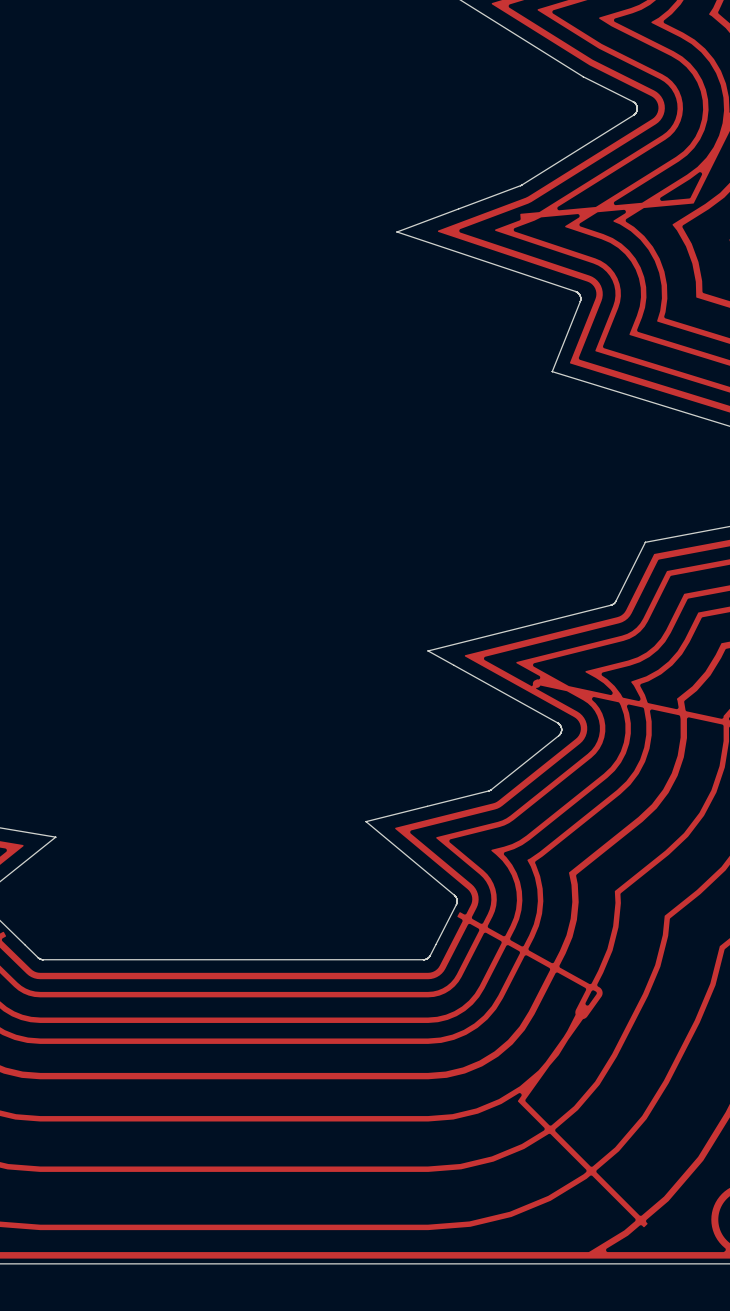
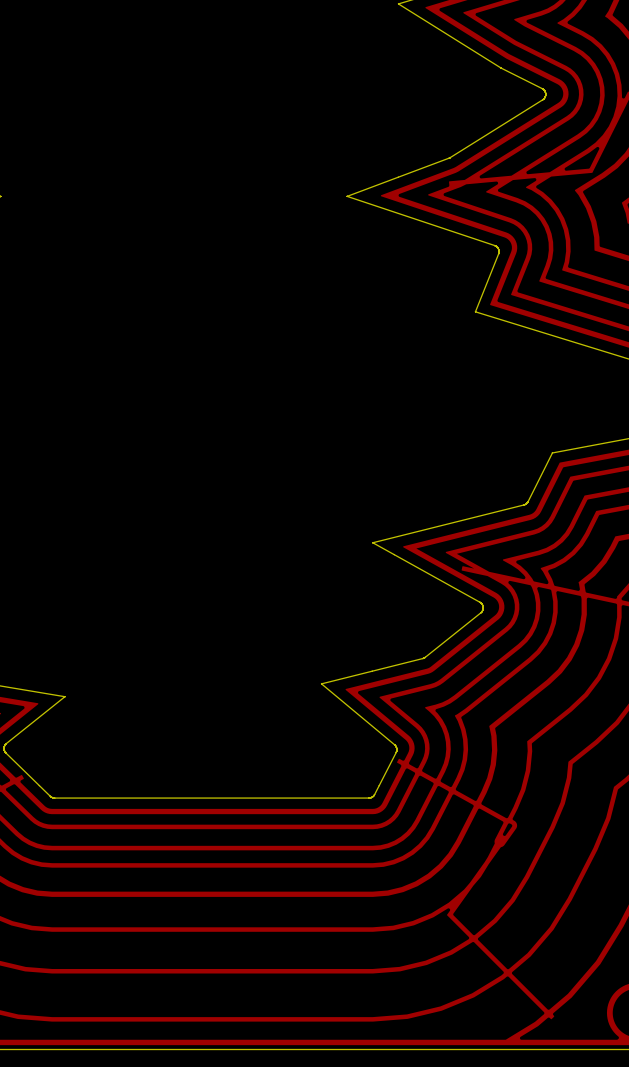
drawing shape: [464, 631, 559, 709] -> [403, 526, 481, 591]
drawing: none -> [445, 543, 481, 575]

